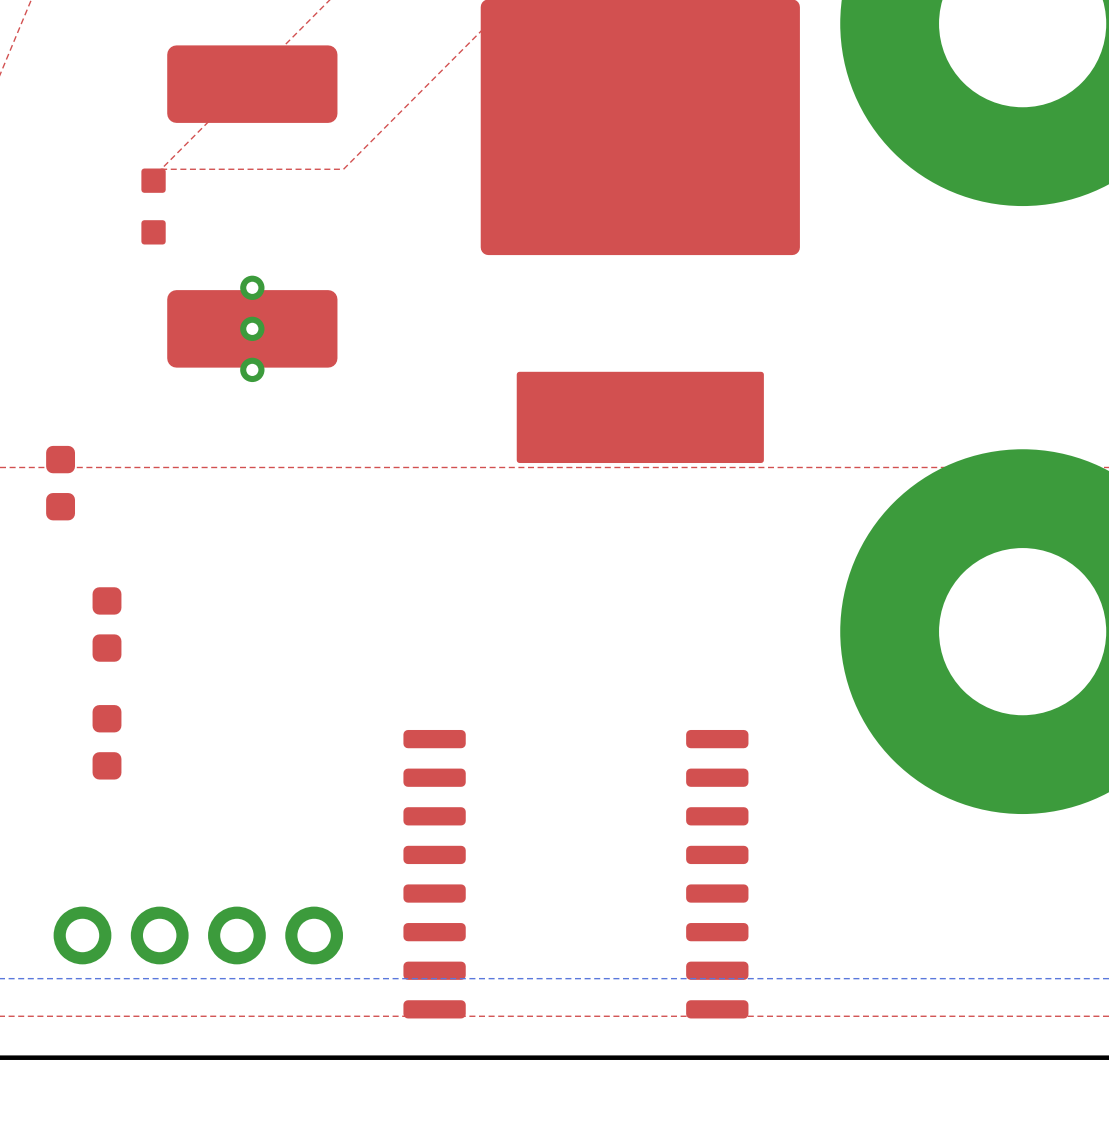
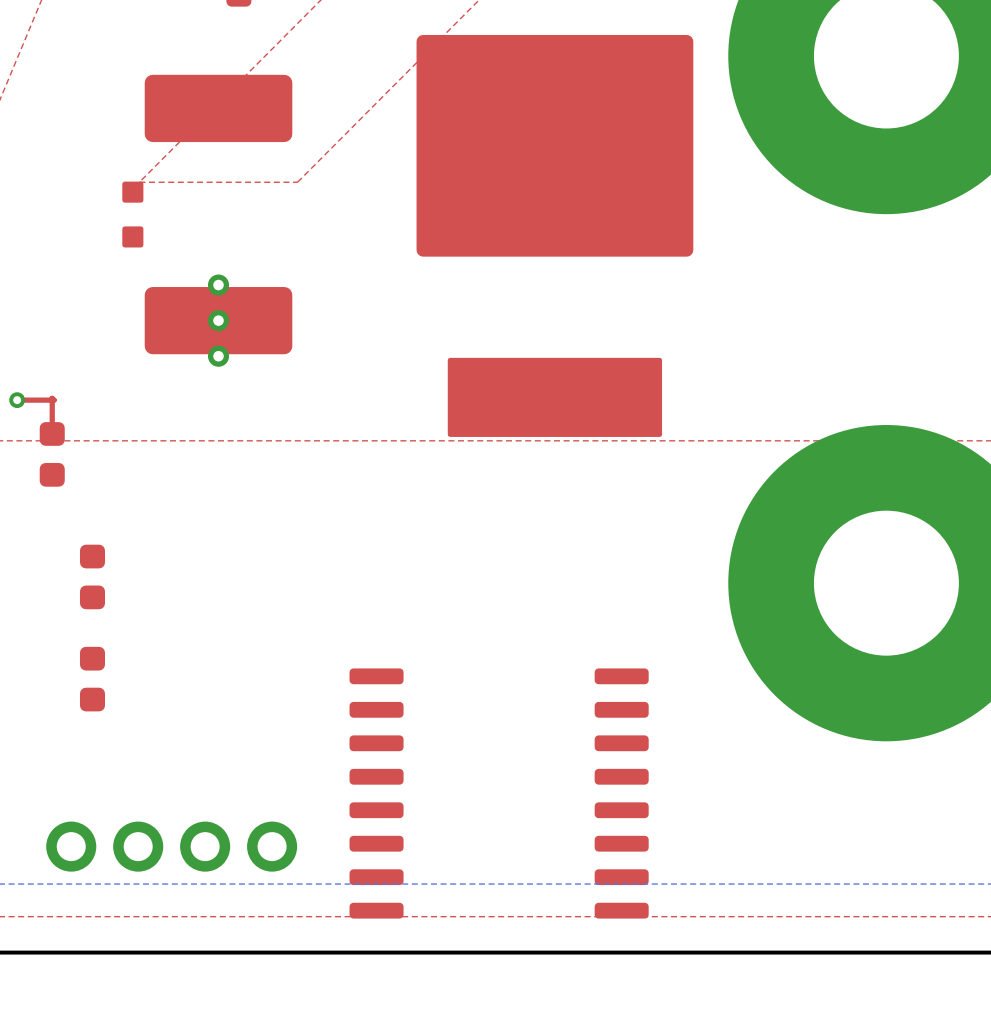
top track: none -> (17, 400) (54, 400) (52, 398) (52, 433)
via: none -> (17, 400)

